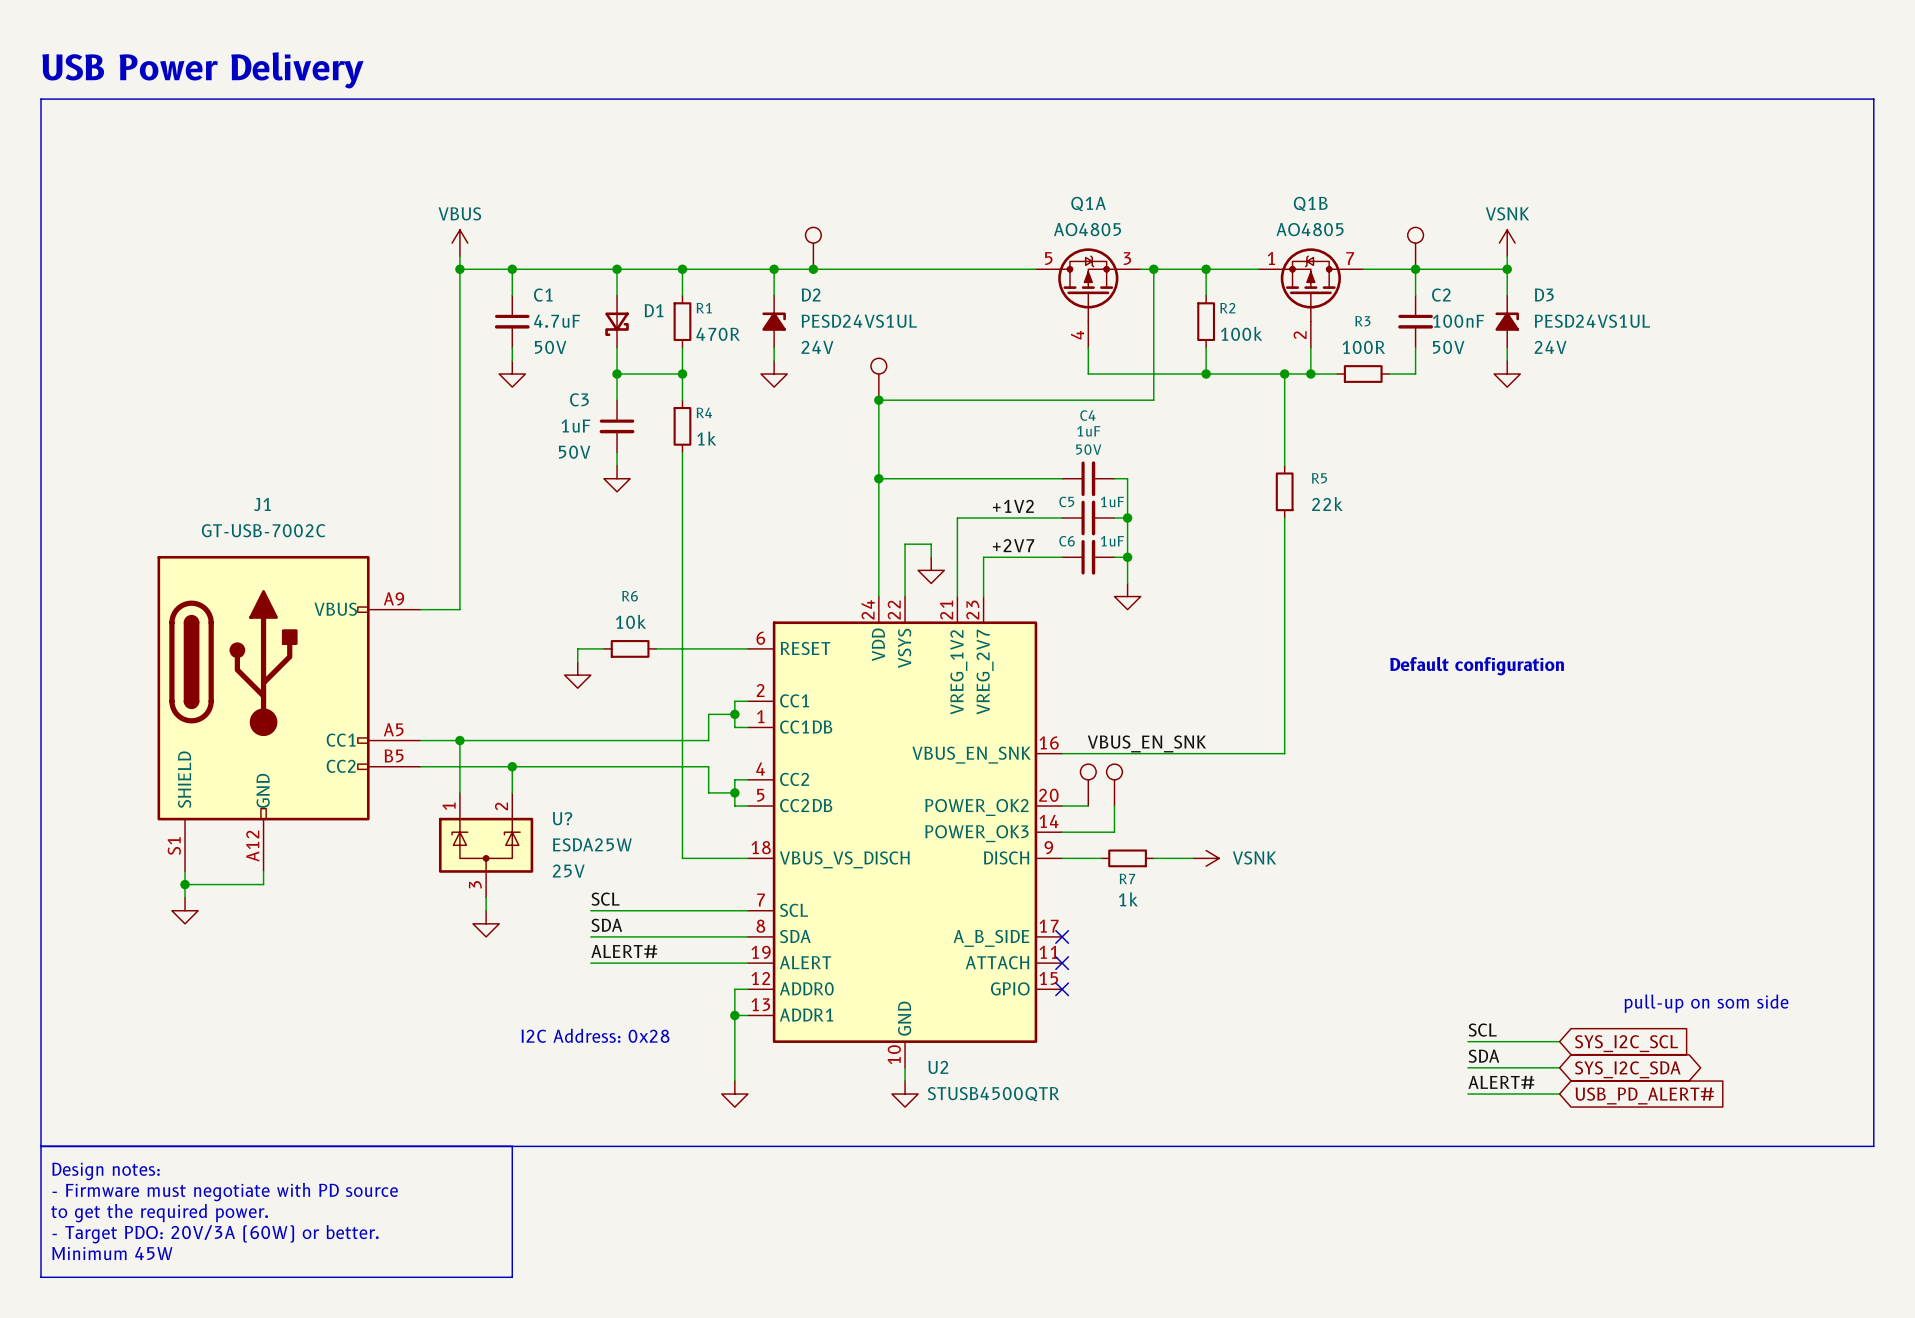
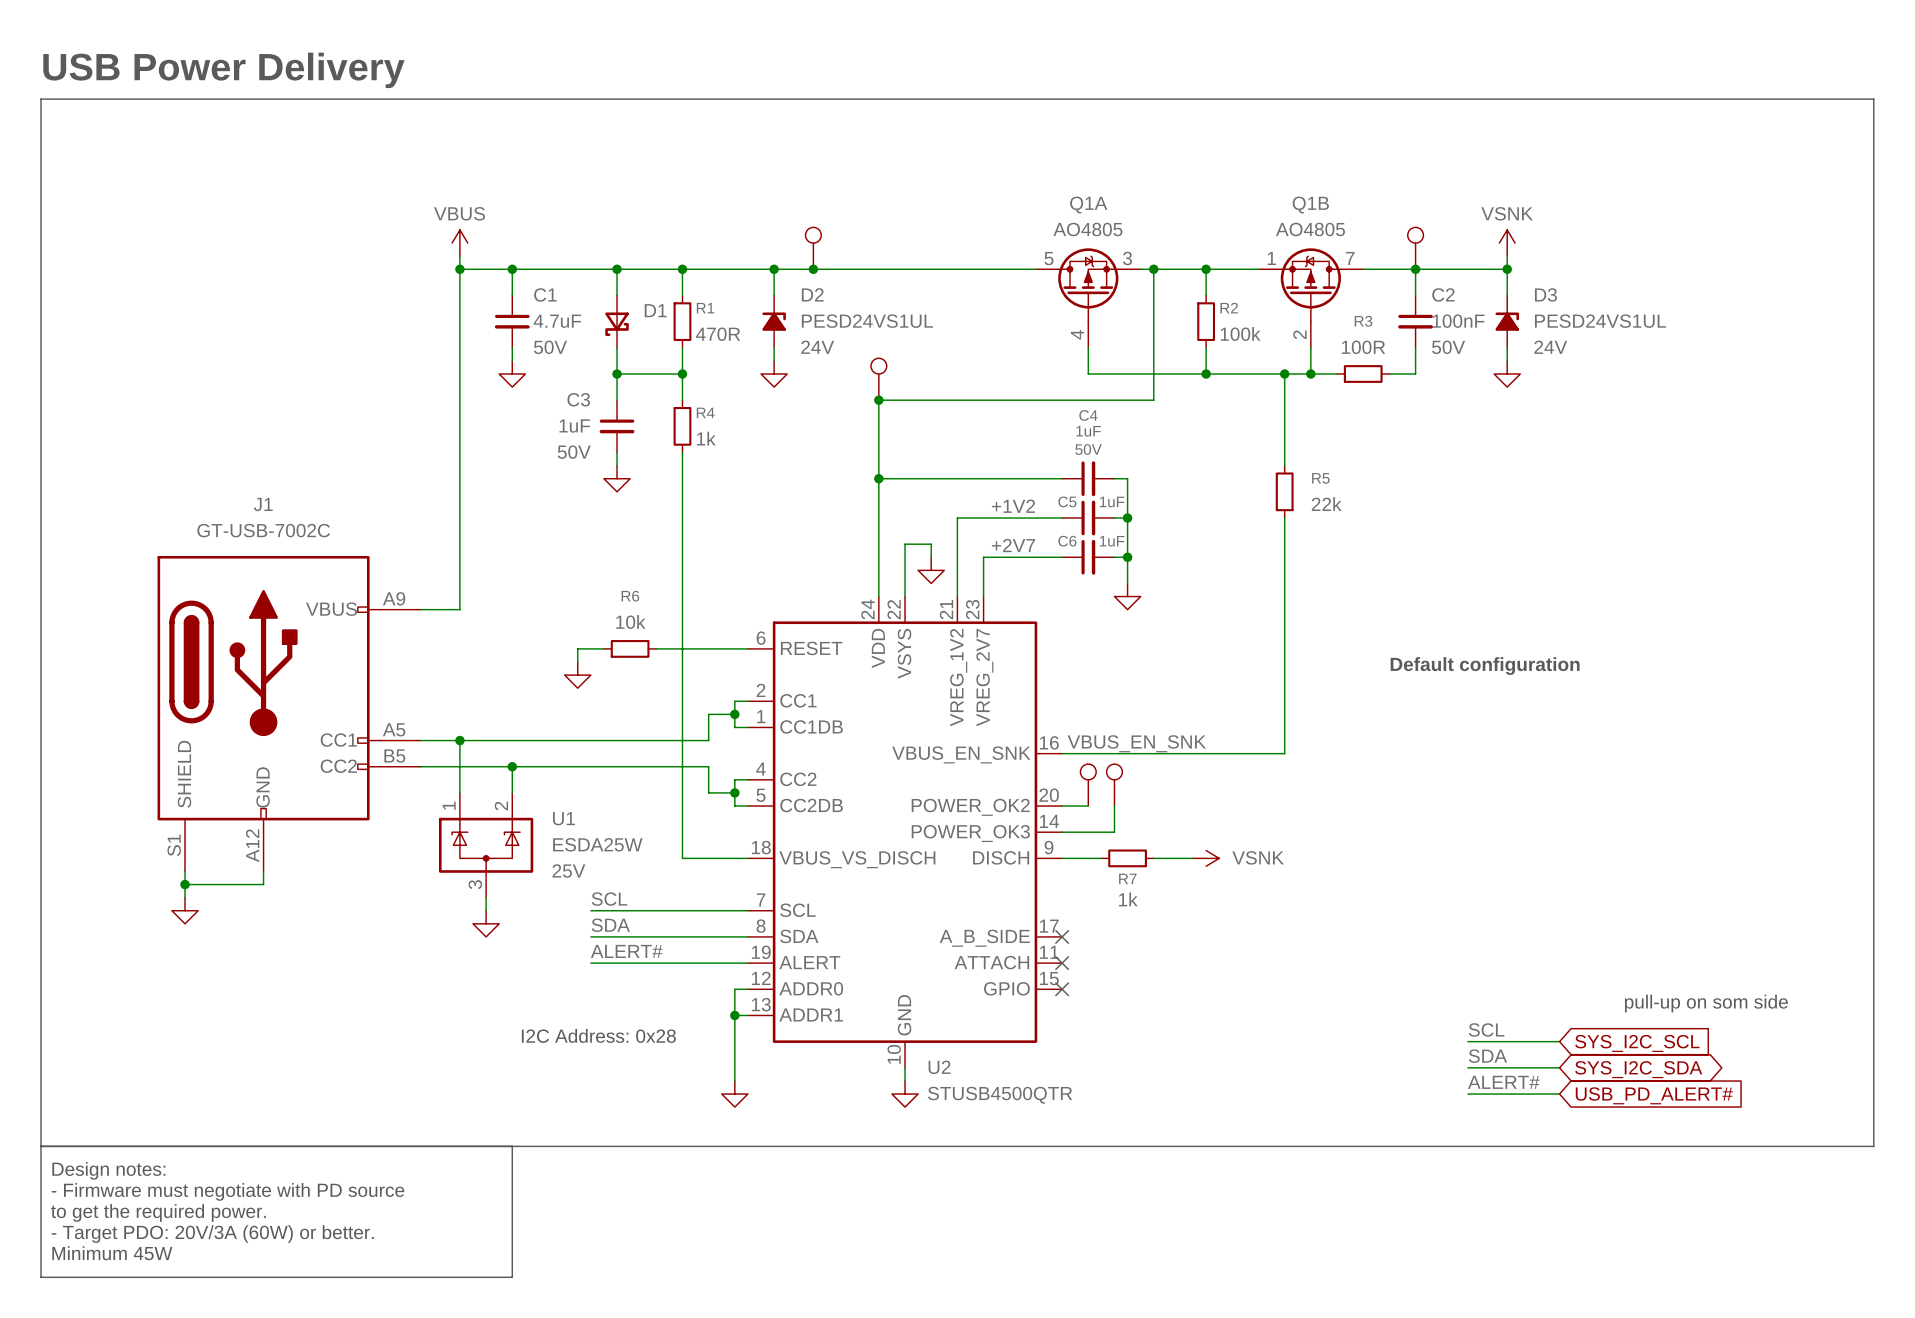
U? name: U? (562, 818) -> U1 (563, 818)

